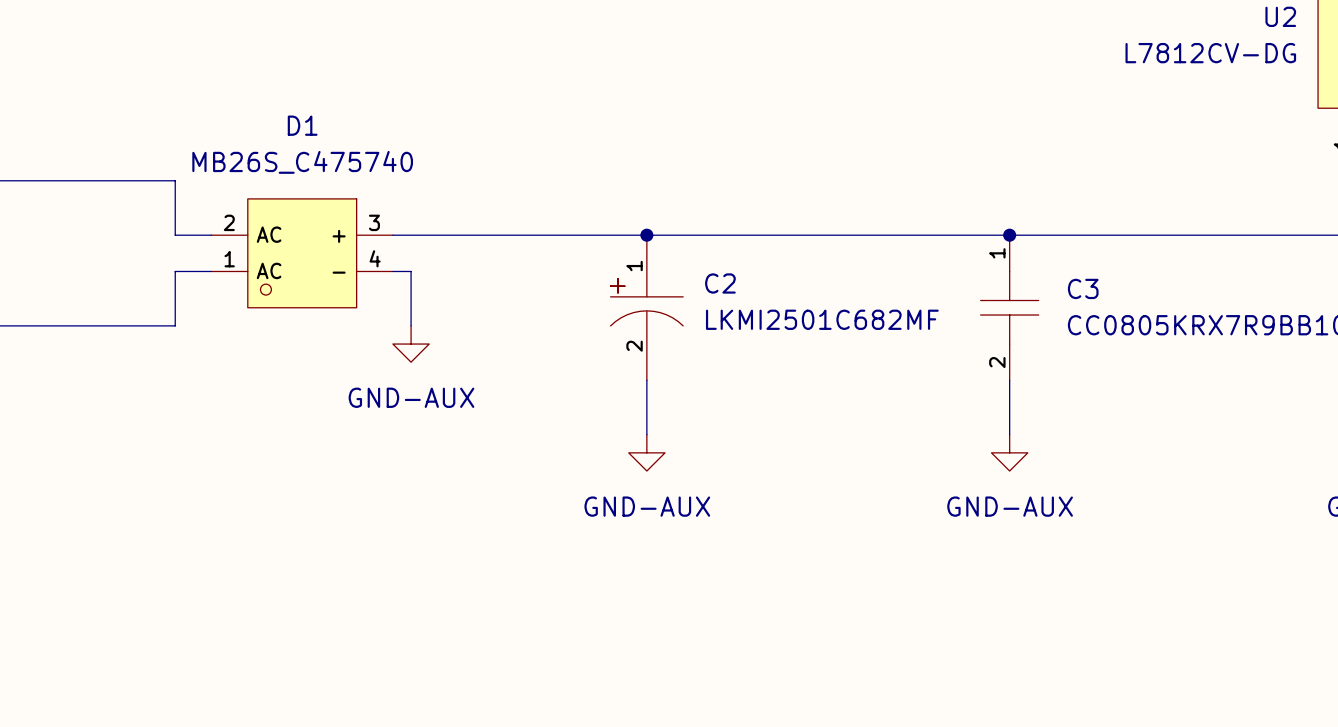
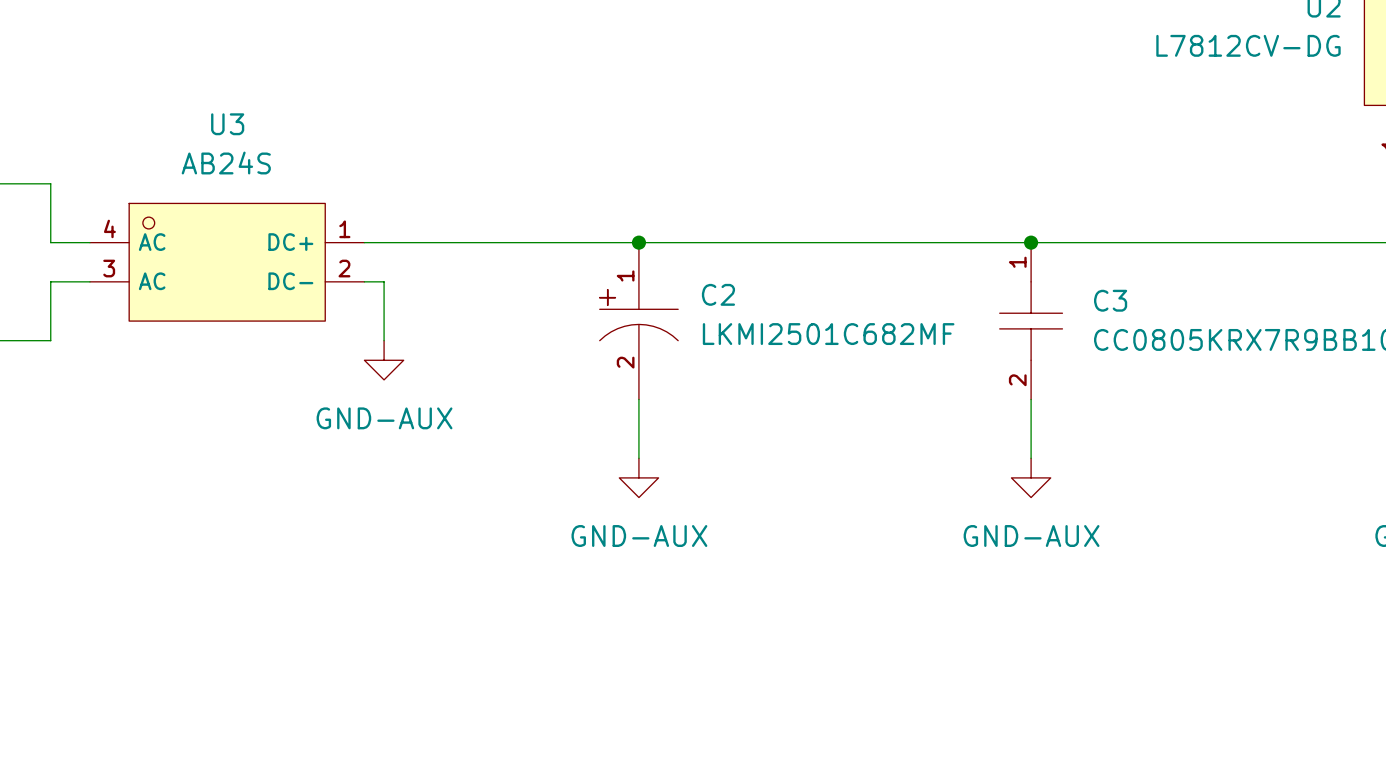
wire: (102, 180) (175, 180) (175, 235) (211, 235) -> (50, 183) (50, 242) (89, 242)
U3: none -> AB24S (227, 262)
D1: MB26S_C475740 (302, 253) -> none
wire: (211, 271) (175, 271) (175, 325) (102, 325) -> (89, 281) (50, 281) (50, 340)

